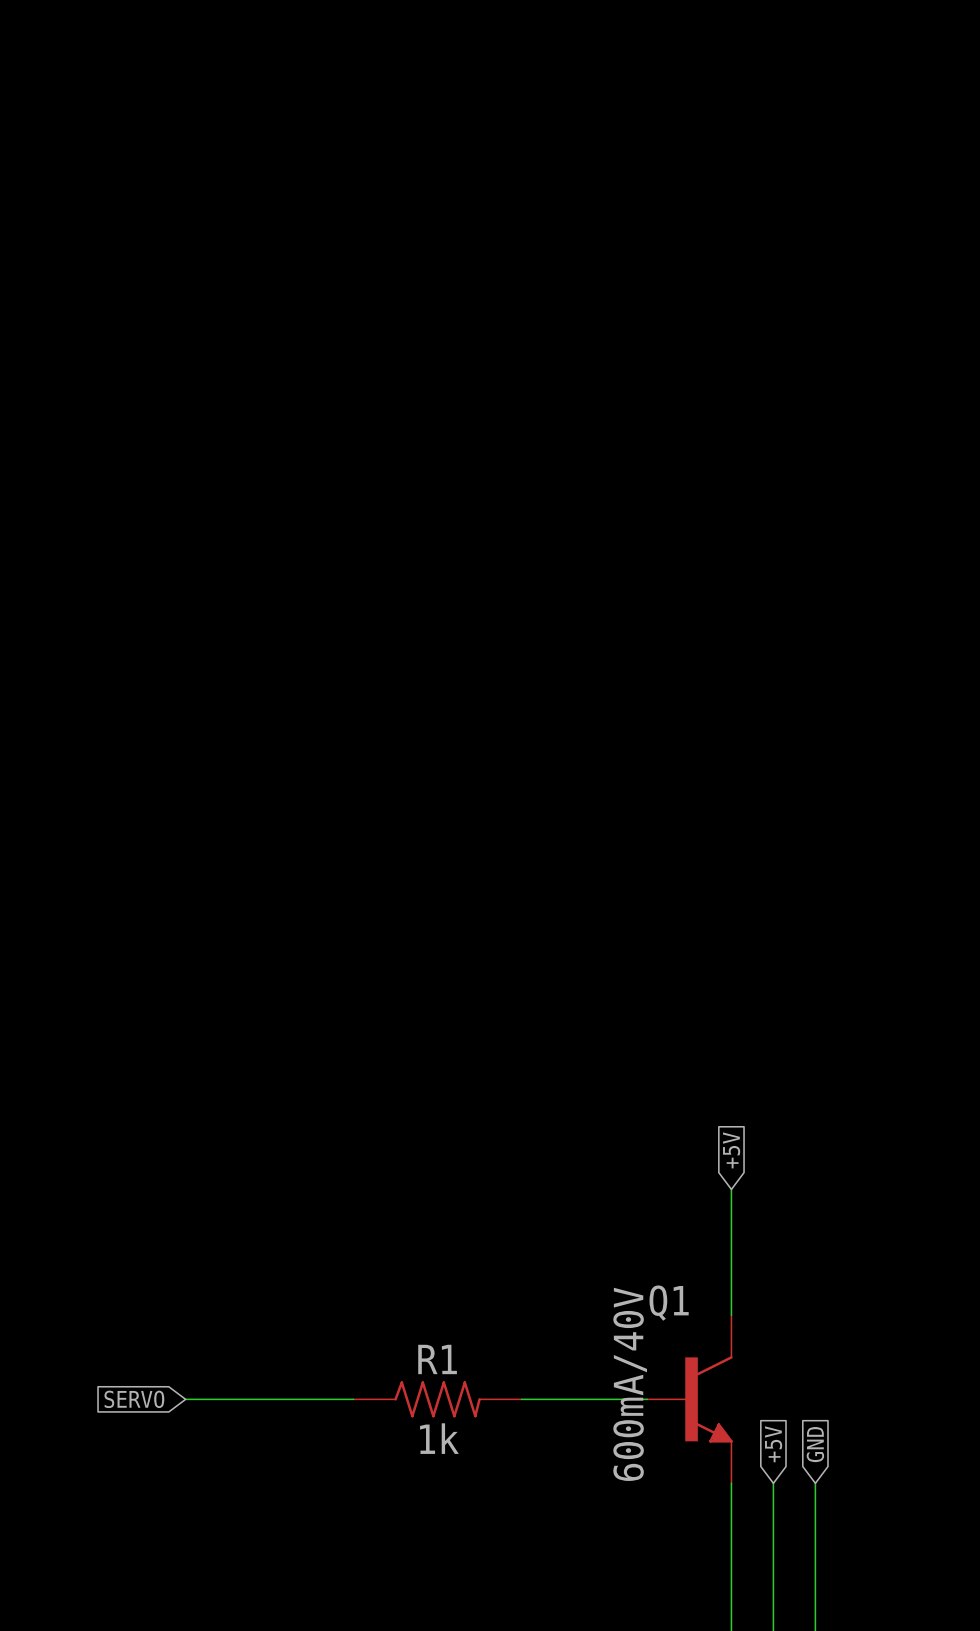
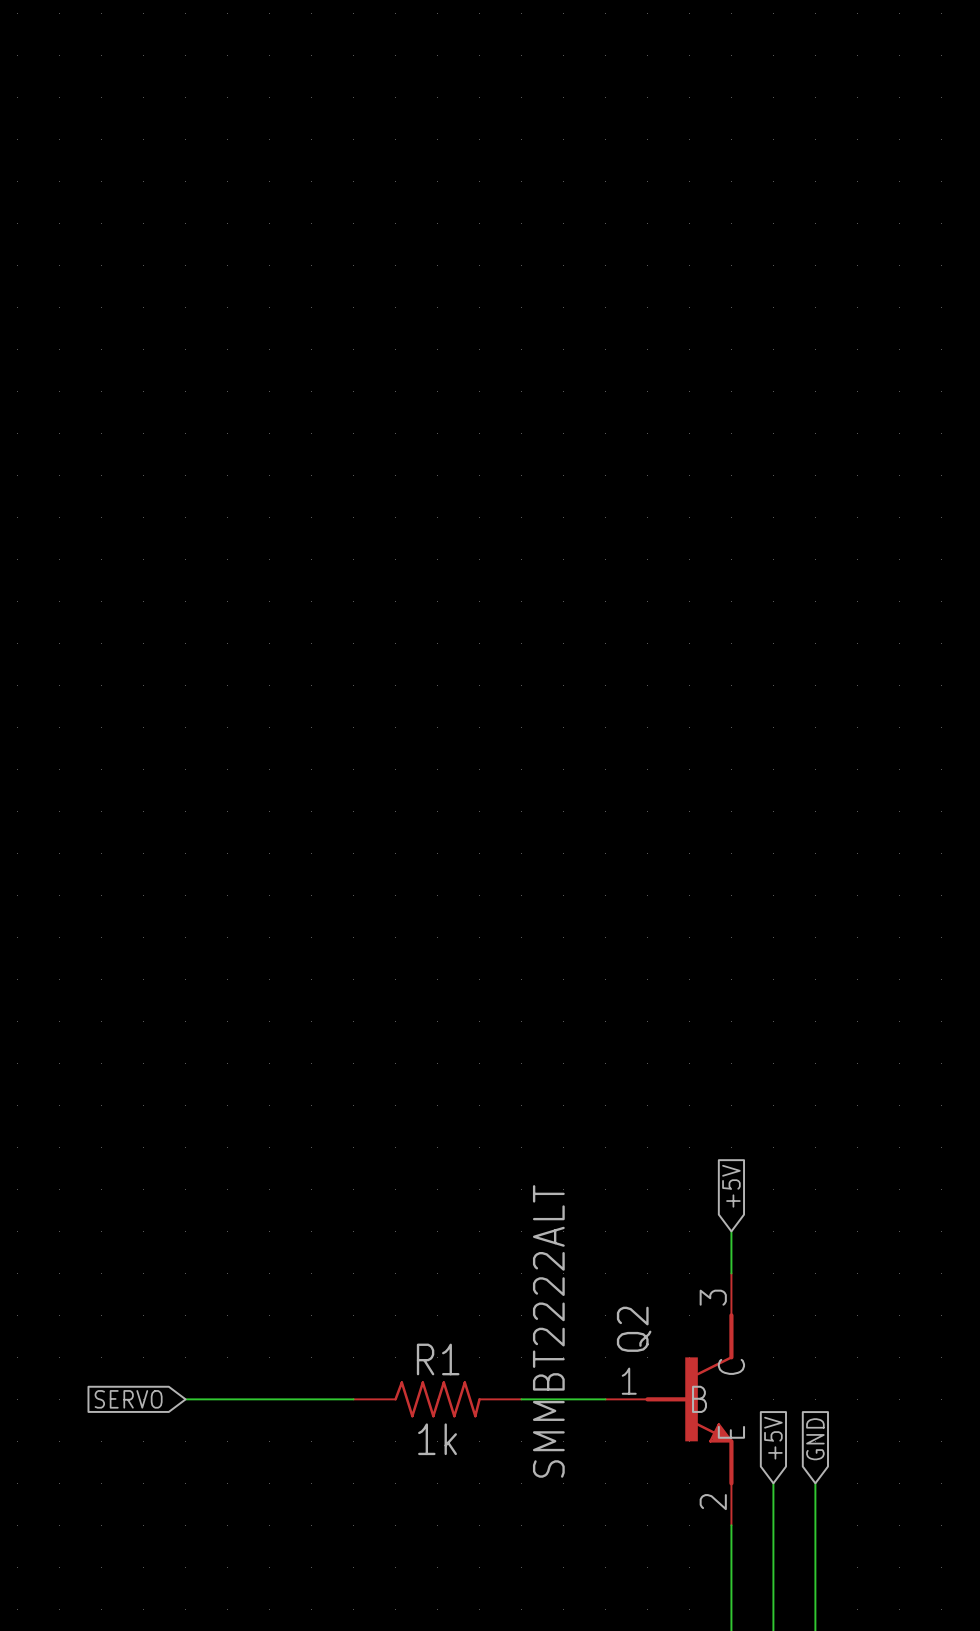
global label position: +5V (731, 1150) -> +5V (731, 1186)
wire: (731, 1189) (731, 1231) -> none
Q2: none -> SMMBT2222ALT (669, 1399)
Q1: 600mA/40V (690, 1399) -> none

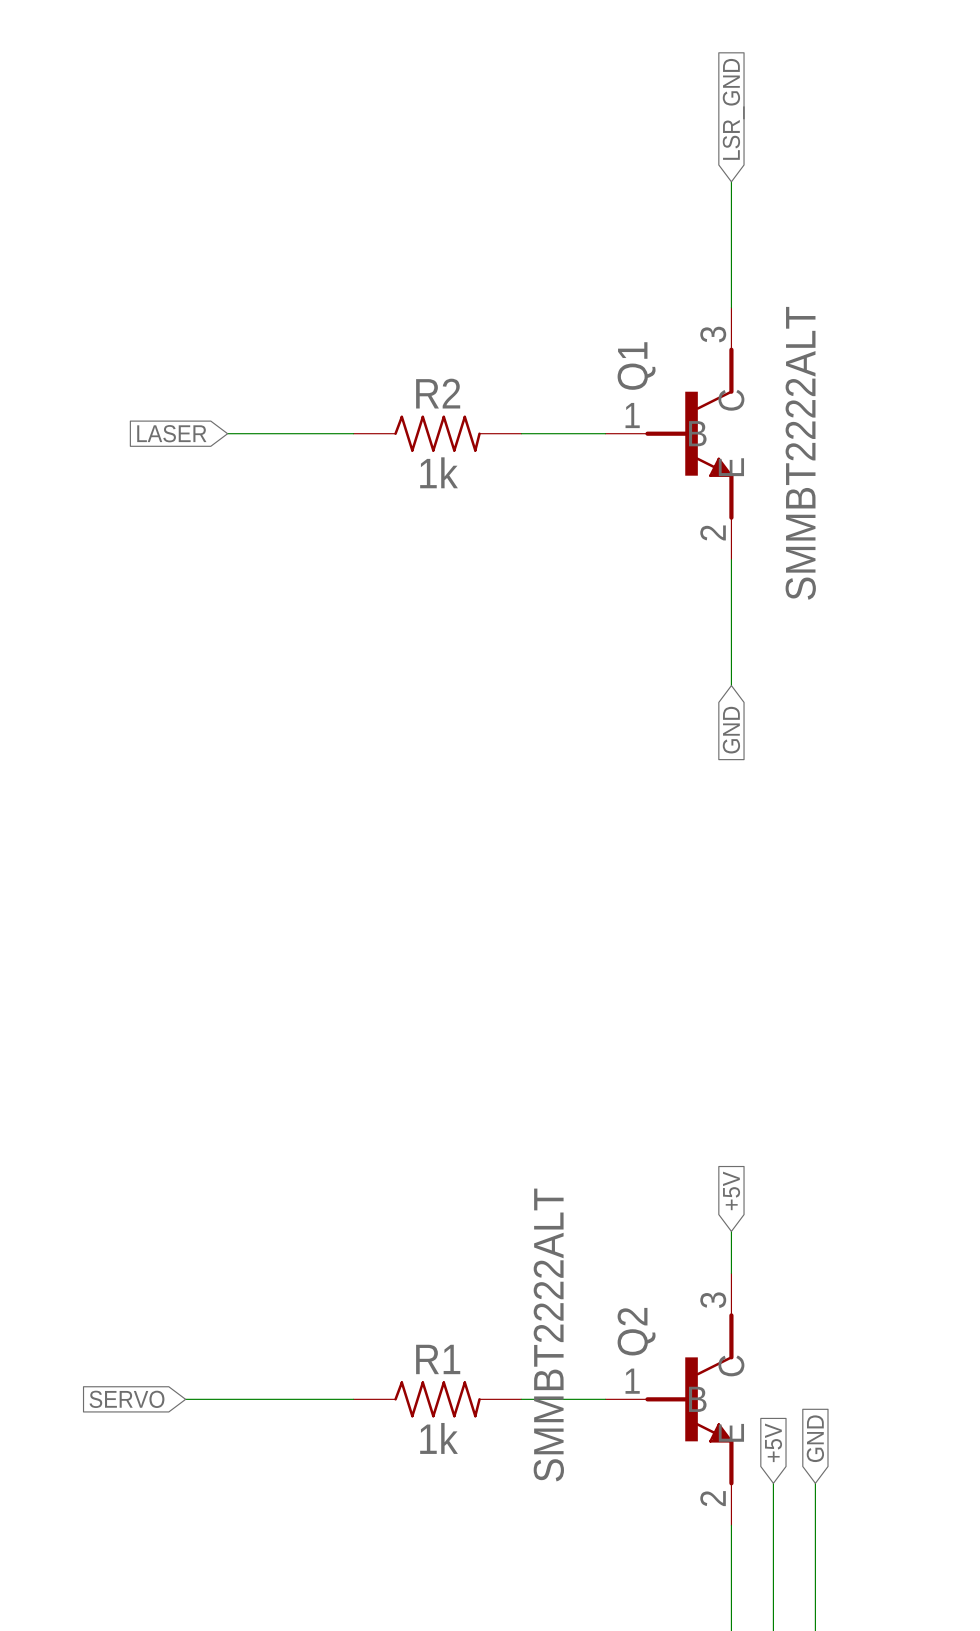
global label: none -> LSR_GND (733, 109)
wire: none -> (731, 181) (731, 307)
global label: none -> LASER (171, 433)
wire: none -> (227, 433) (353, 433)
R2: none -> 1k (437, 433)
wire: none -> (521, 433) (605, 433)
Q1: none -> SMMBT2222ALT (669, 433)
wire: none -> (731, 559) (731, 685)
global label: none -> GND (731, 730)

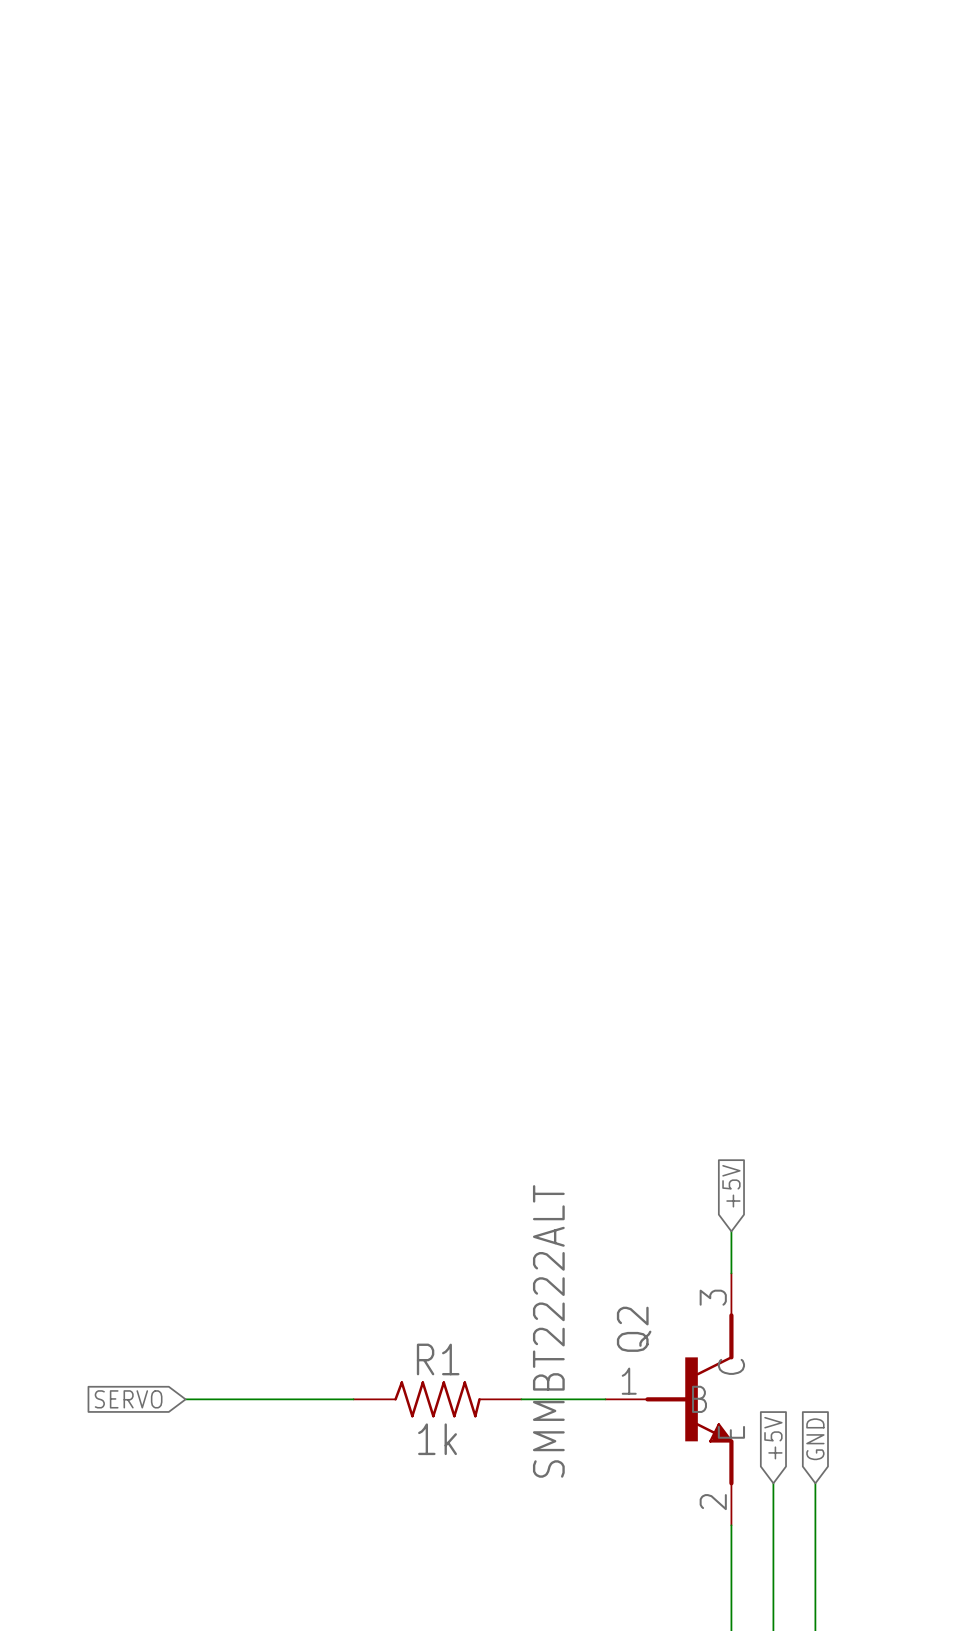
global label: LSR_GND (733, 109) -> none
wire: (731, 181) (731, 307) -> none
global label: LASER (171, 433) -> none
wire: (227, 433) (353, 433) -> none
R2: 1k (437, 433) -> none
wire: (521, 433) (605, 433) -> none
Q1: SMMBT2222ALT (669, 433) -> none
wire: (731, 559) (731, 685) -> none
global label: GND (731, 730) -> none

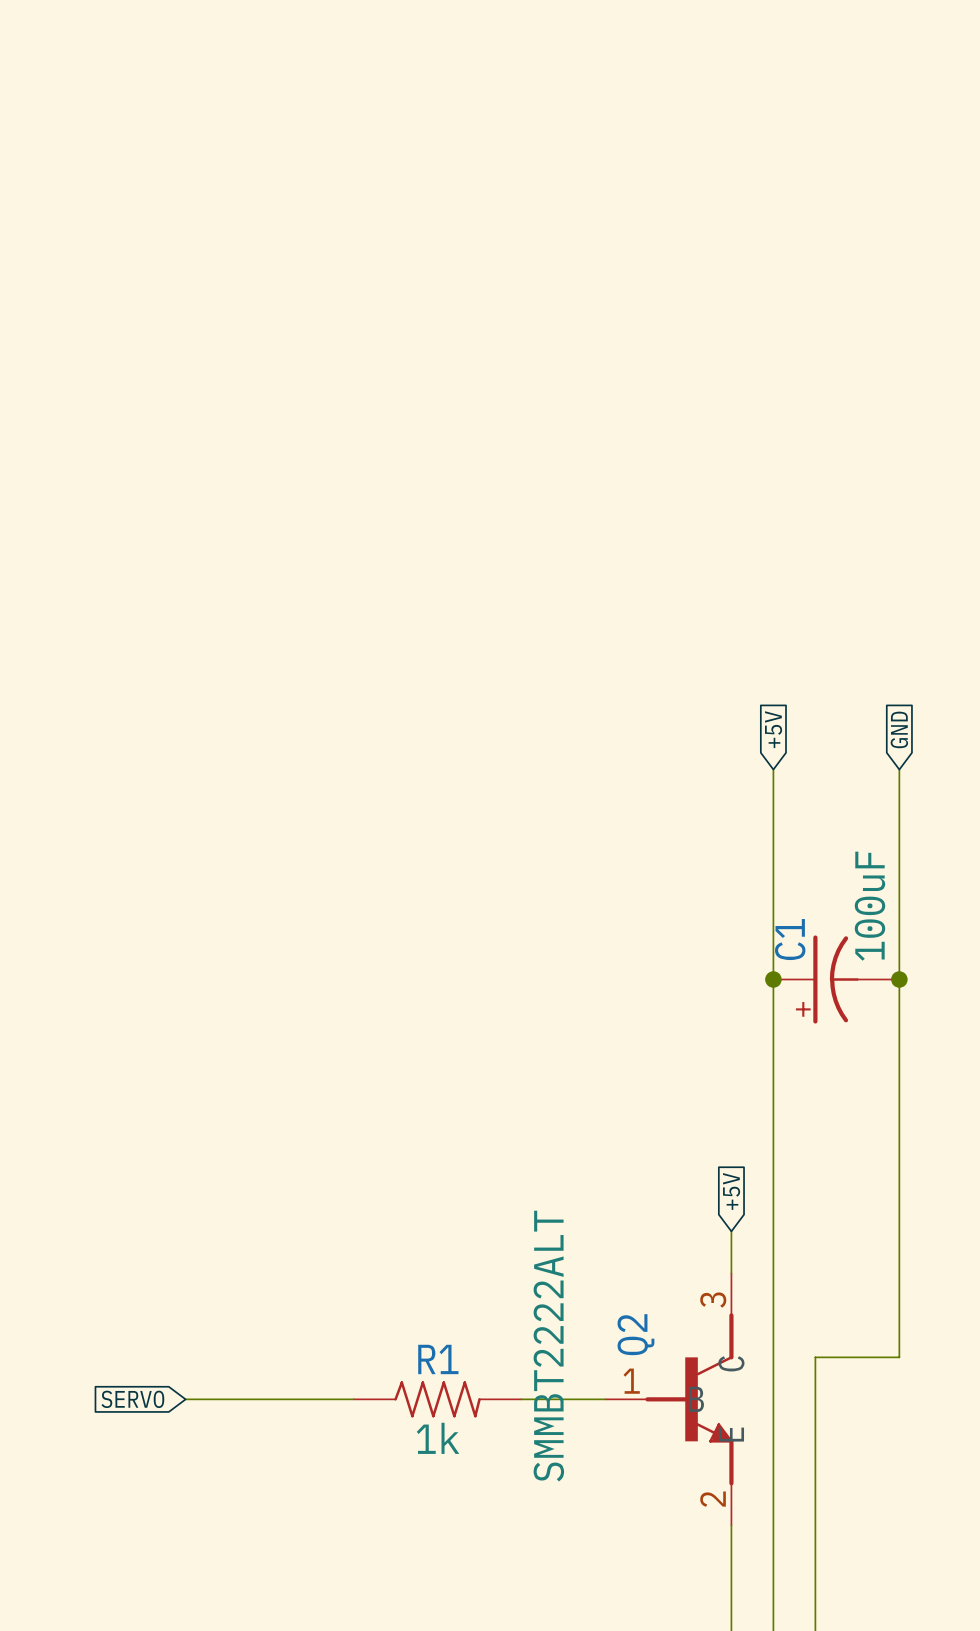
global label: none -> +5V (773, 729)
global label: none -> GND (899, 729)
wire: none -> (773, 769) (773, 1483)
wire: none -> (899, 769) (899, 1357) (815, 1357) (815, 1483)
junction: none -> (773, 979)
C1: none -> 100uF (836, 979)
junction: none -> (899, 979)
global label: +5V (773, 1438) -> none
global label: GND (815, 1439) -> none

